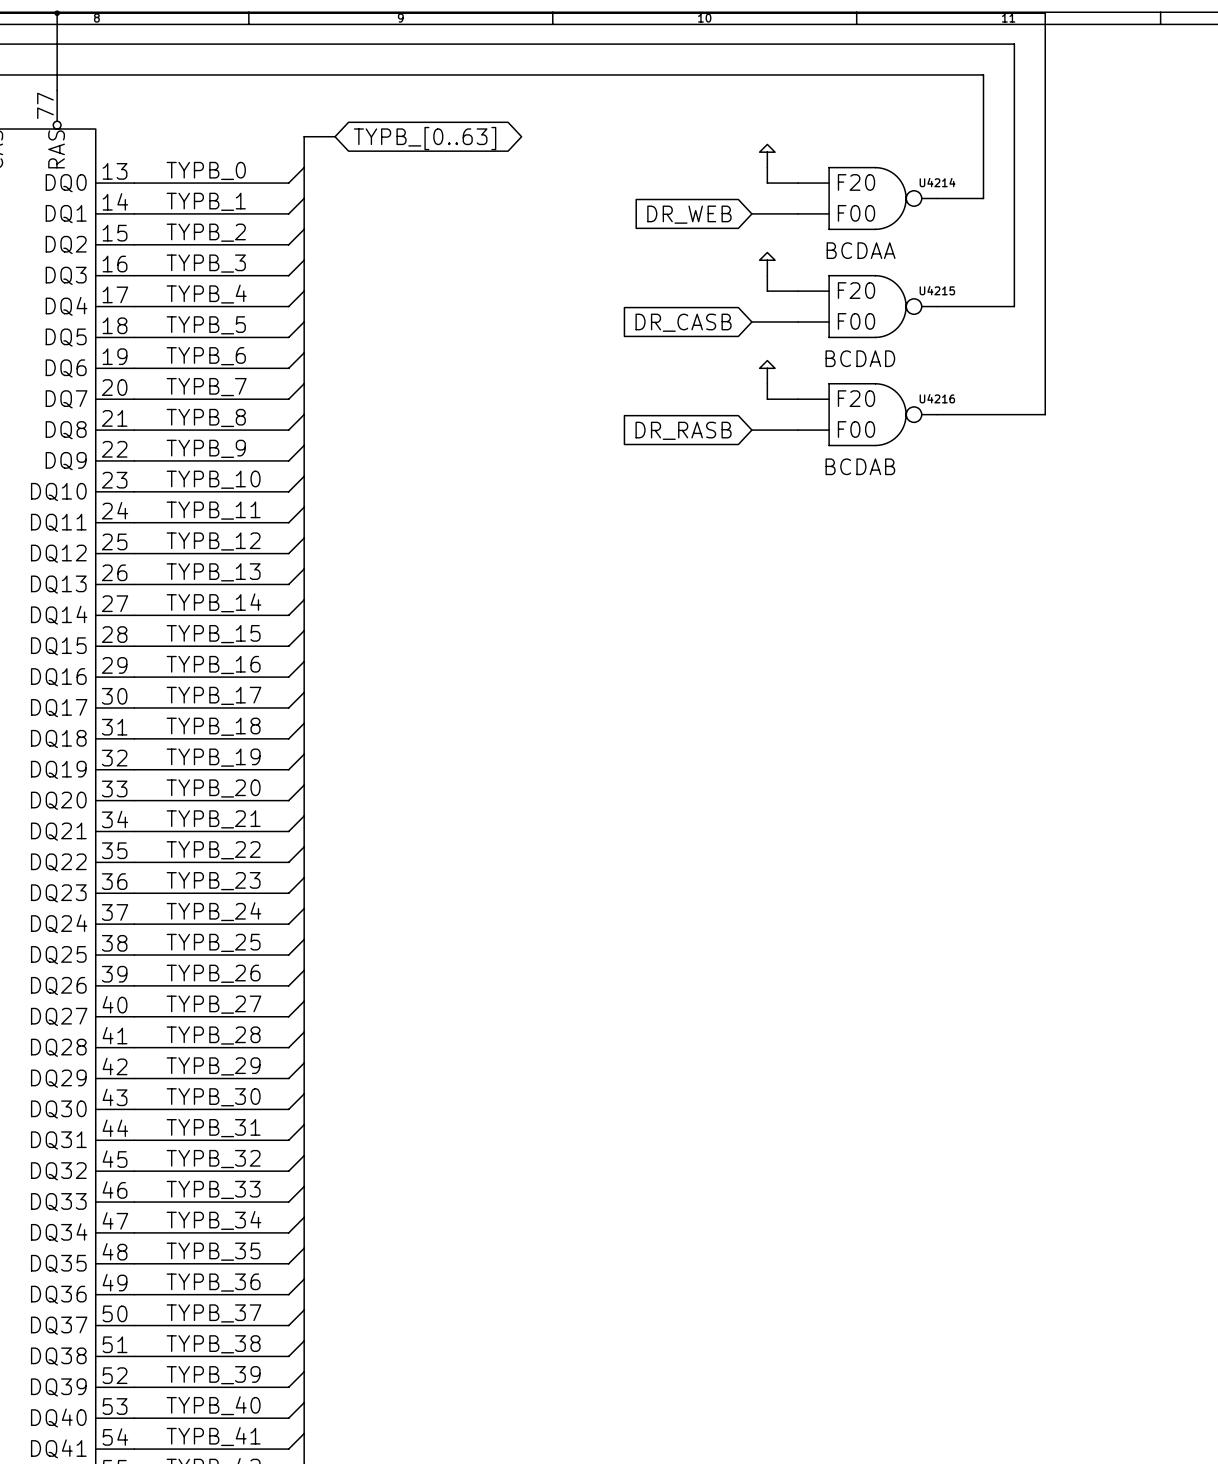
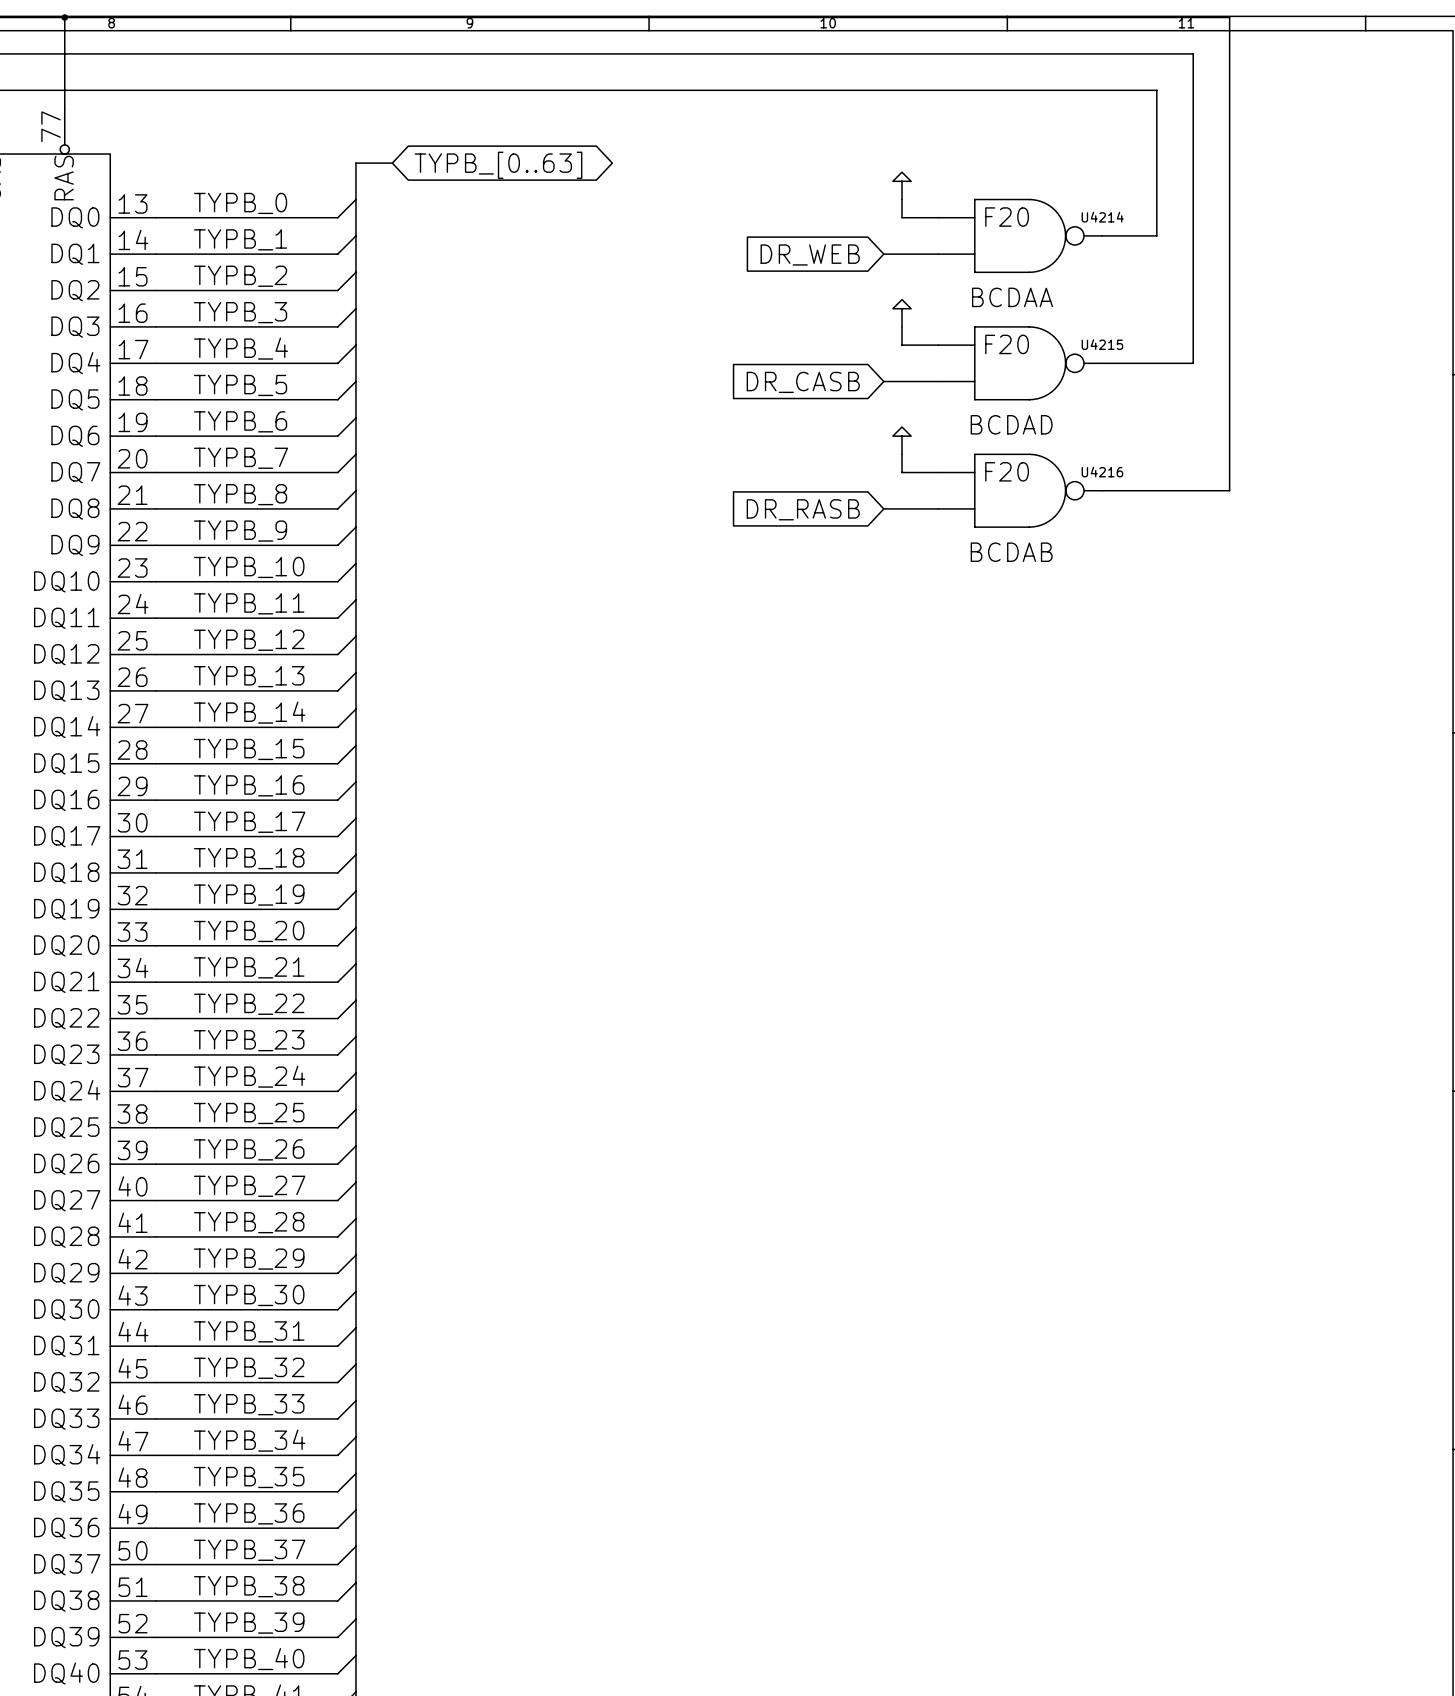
U4214 value: F00 (856, 213) -> none
U4215 value: F00 (856, 321) -> none
U4216 value: F00 (856, 429) -> none

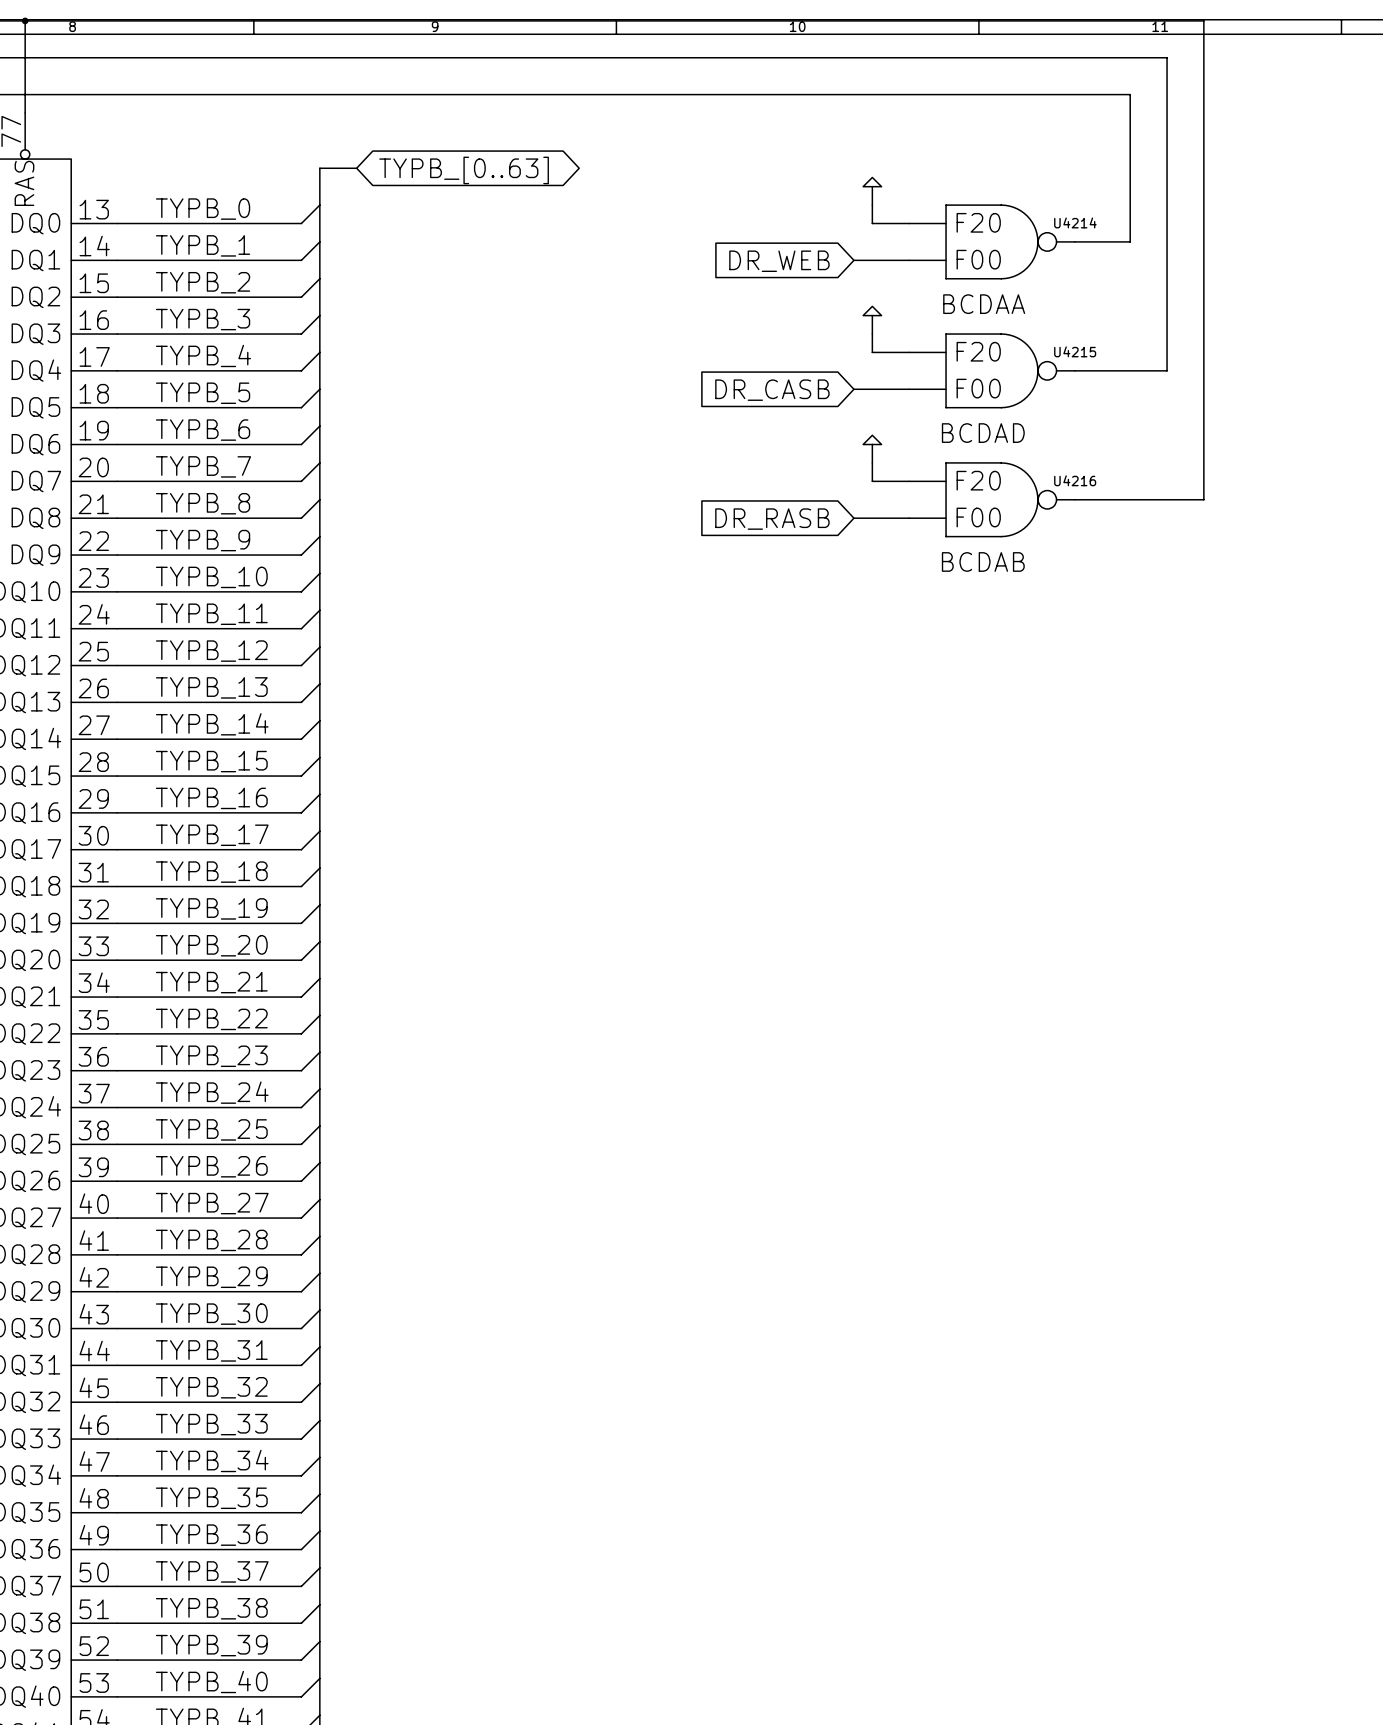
U4214 value: none -> F00 (978, 259)
U4215 value: none -> F00 (978, 388)
U4216 value: none -> F00 (978, 517)

